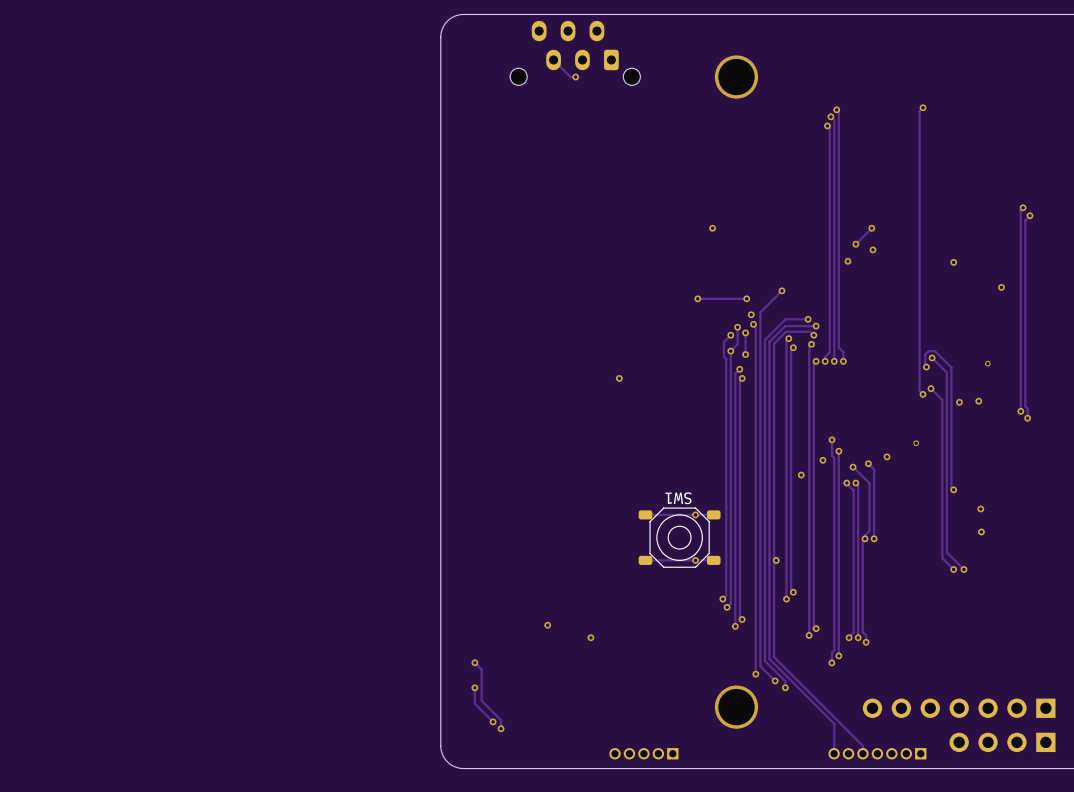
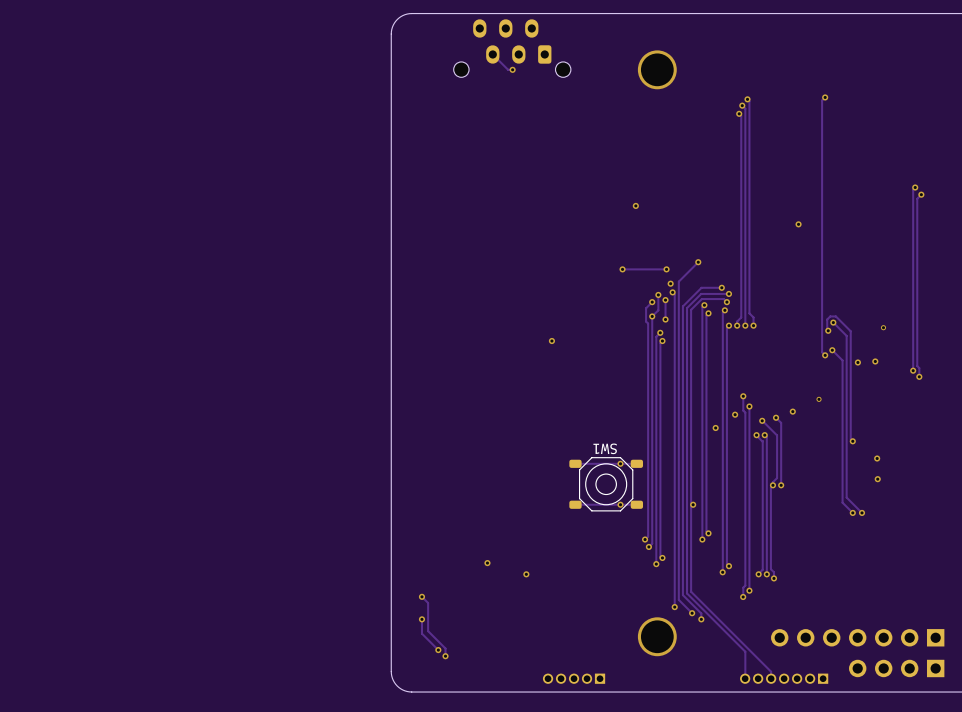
track: (871, 228) (855, 244) -> none
via: (871, 228) -> none
via: (855, 244) -> none
via: none -> (798, 224)
via: (872, 249) -> none
via: (847, 261) -> none
via: (953, 262) -> none
via: (1001, 287) -> none

